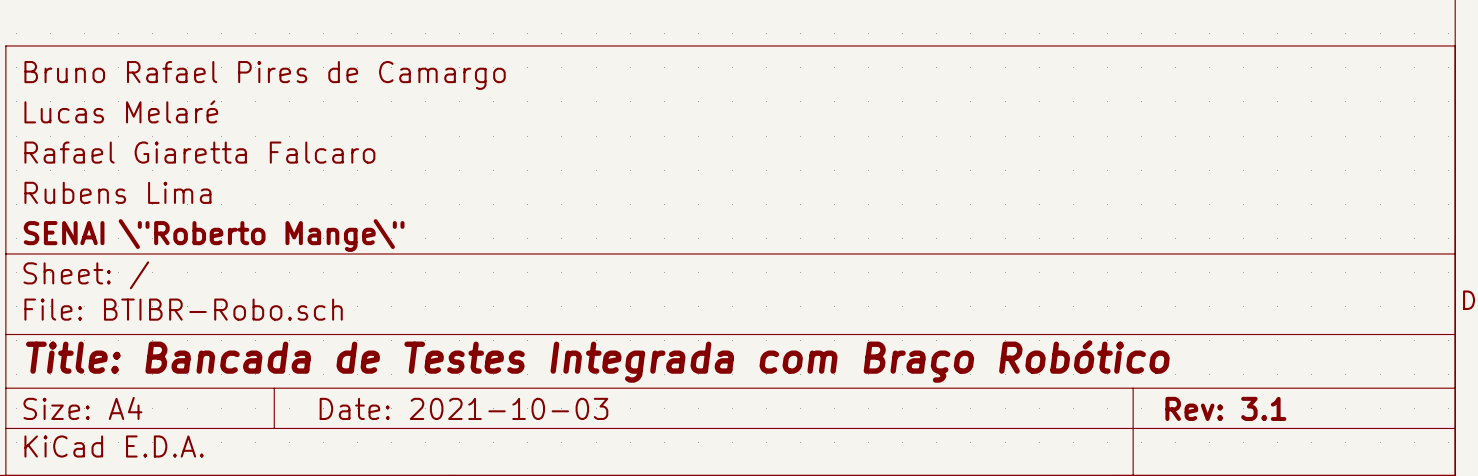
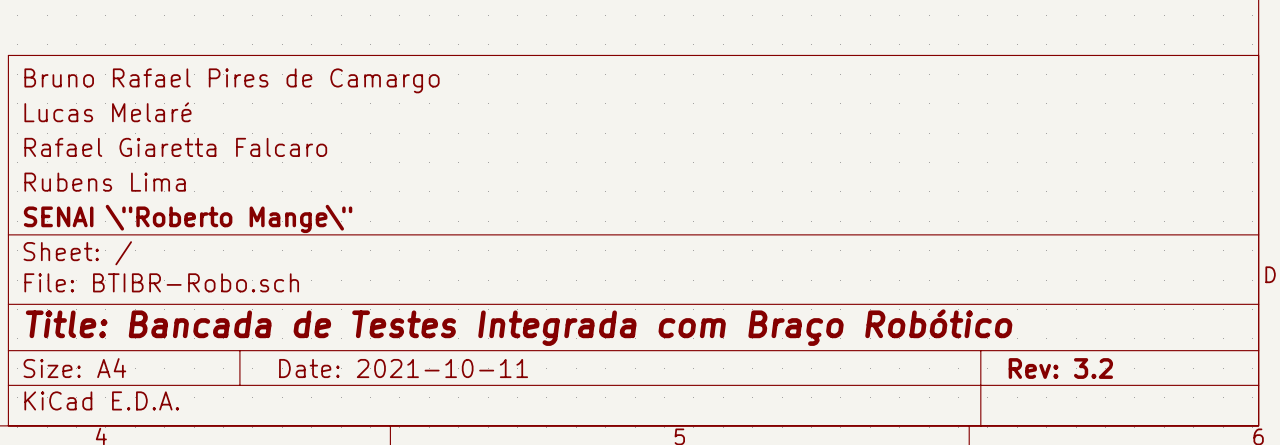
title block: Date: 2021-10-03 (463, 408) -> Date: 2021-10-11 (403, 368)
title block: Rev: 3.1 (1225, 408) -> Rev: 3.2 (1060, 368)

